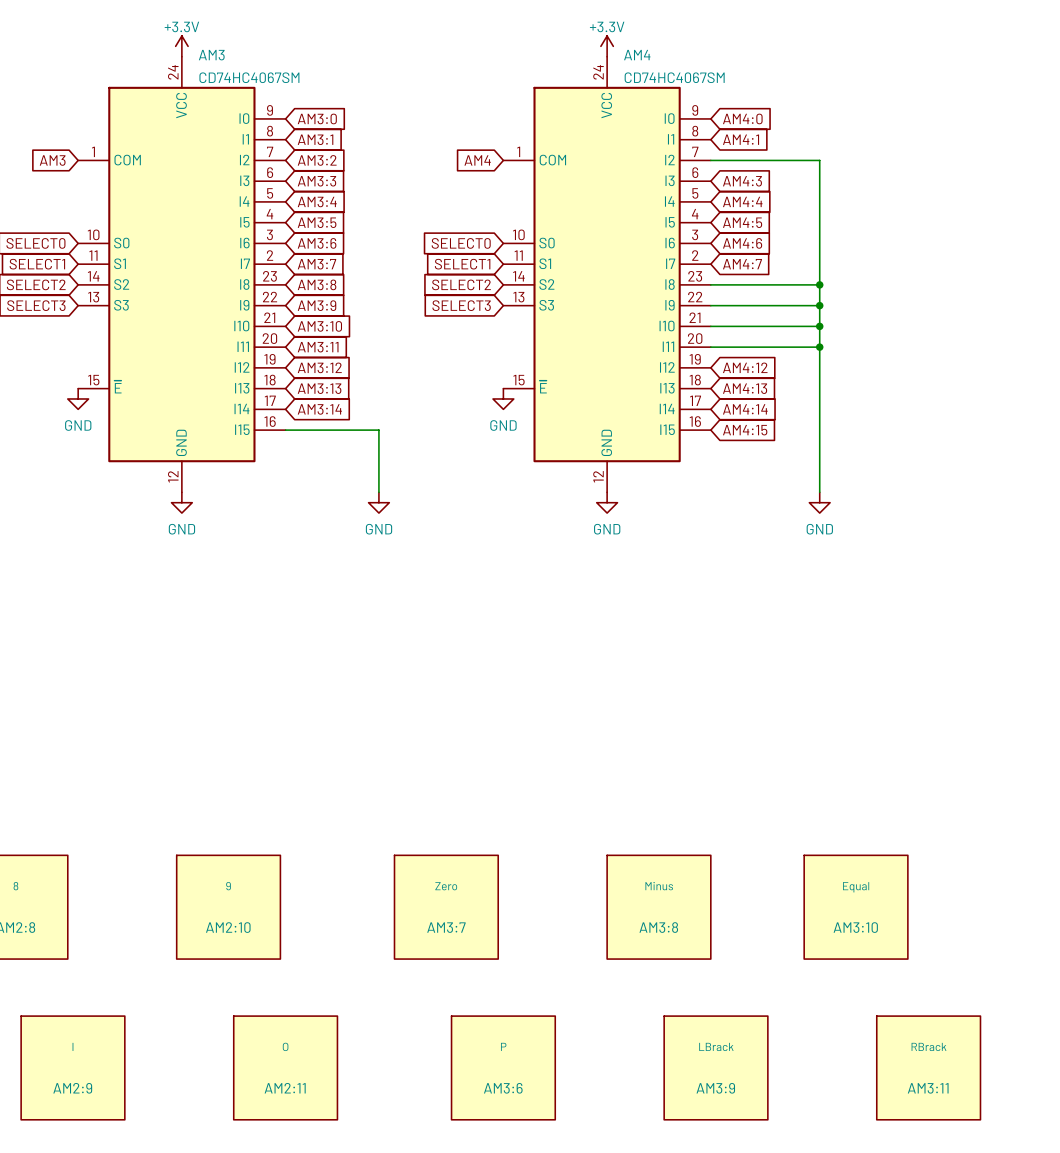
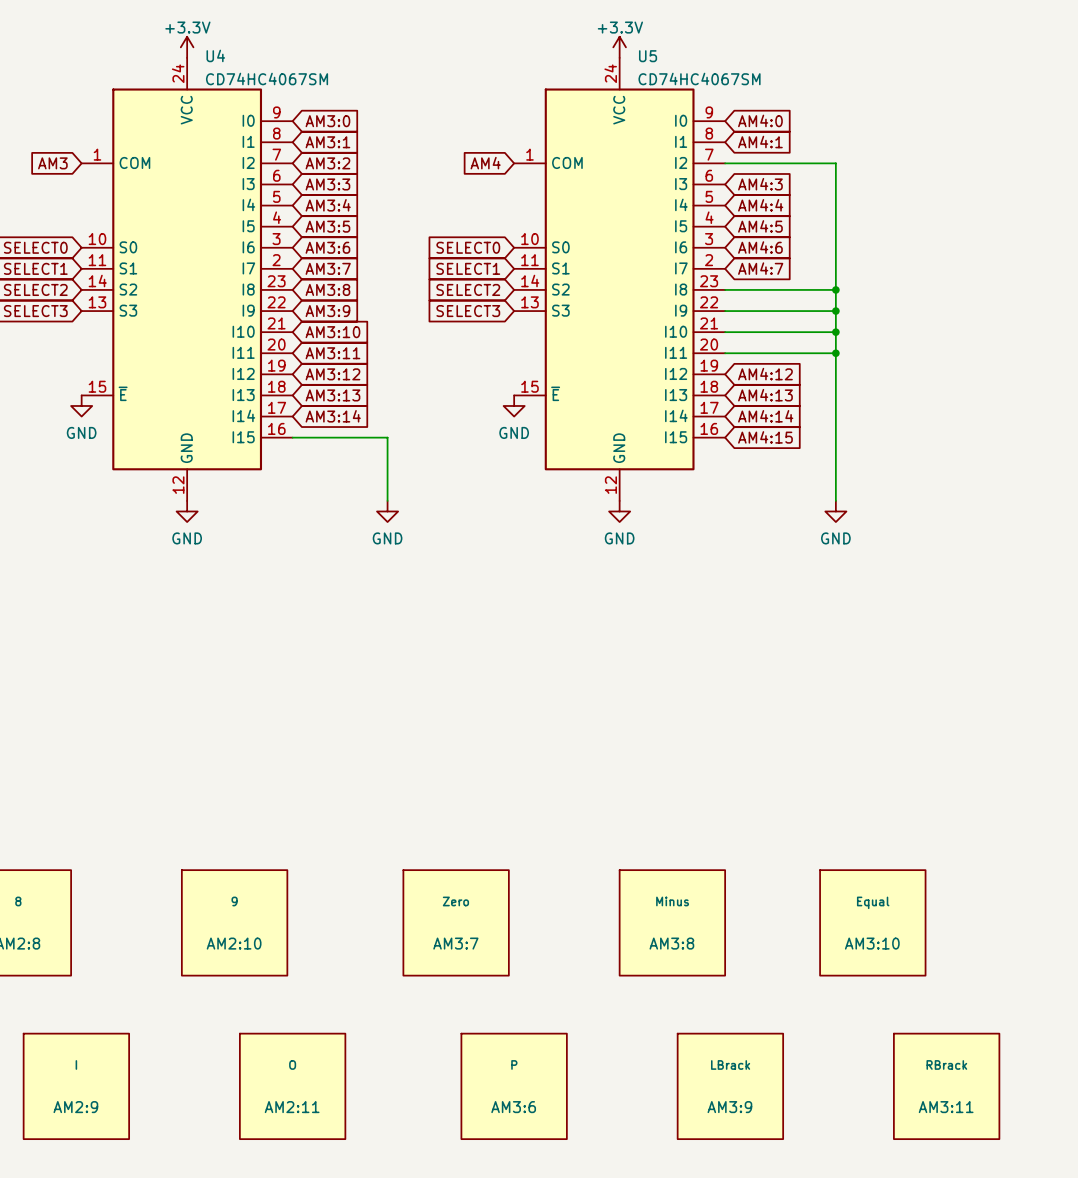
AM3 name: AM3 (211, 55) -> U4 (215, 55)
AM4 name: AM4 (637, 55) -> U5 (648, 56)

